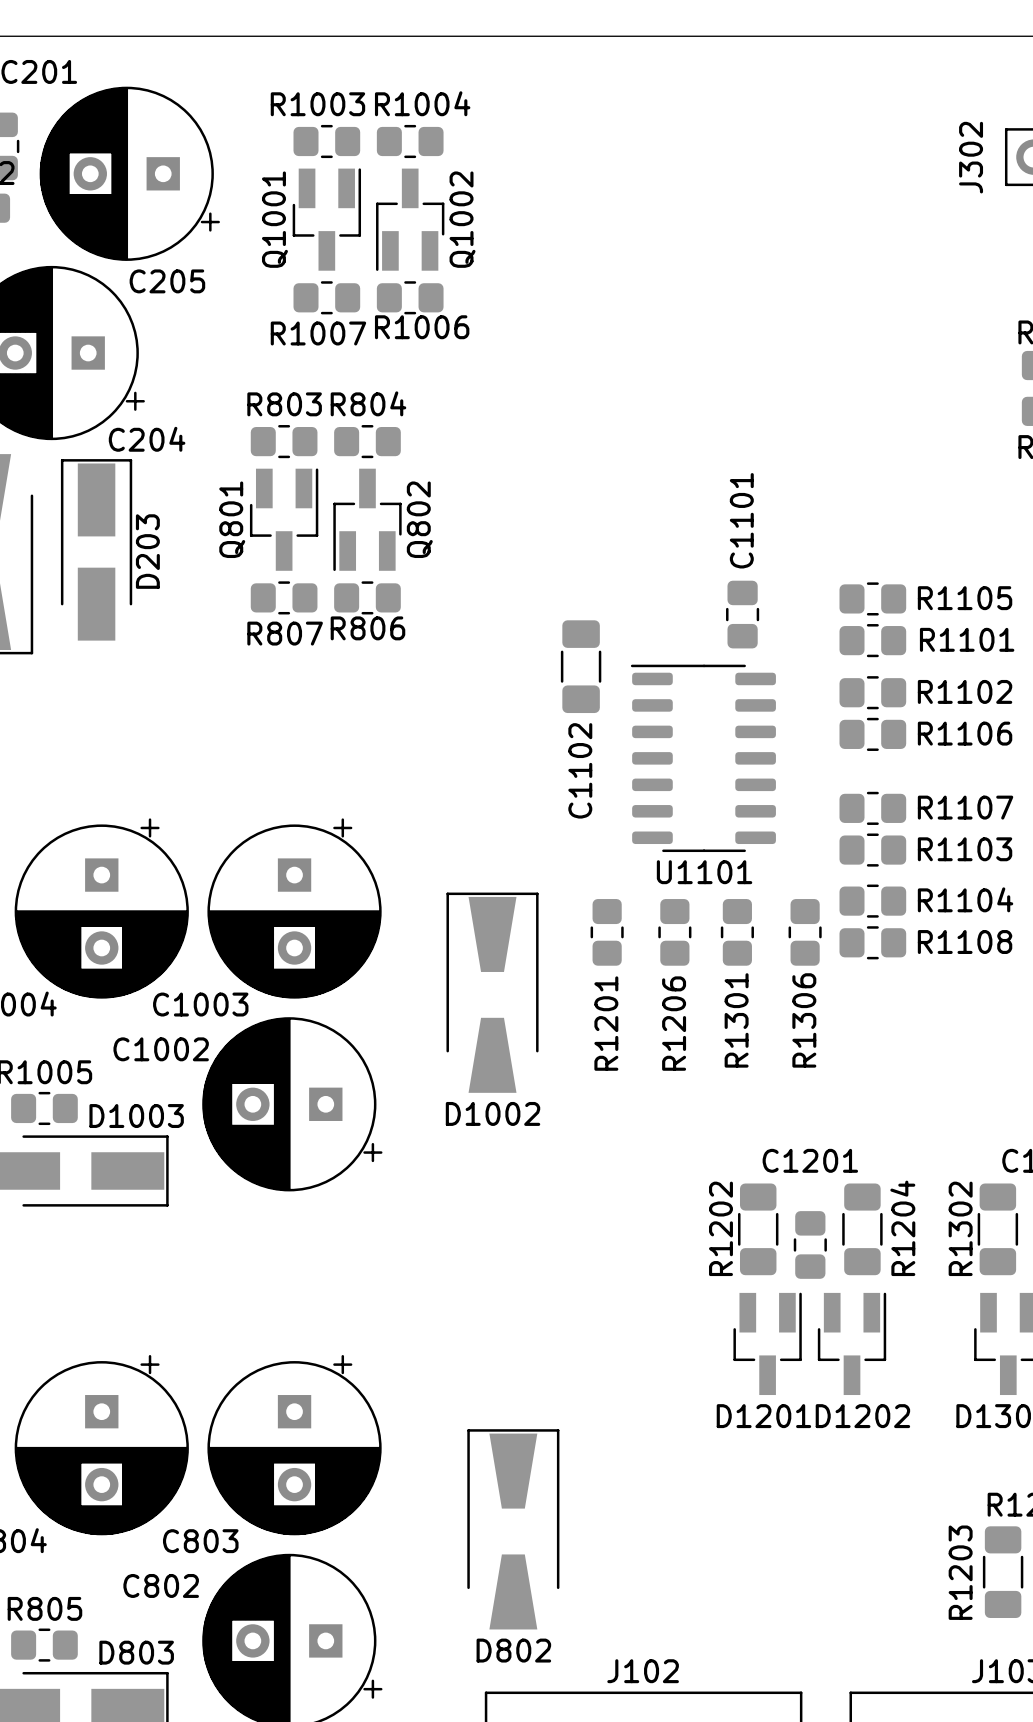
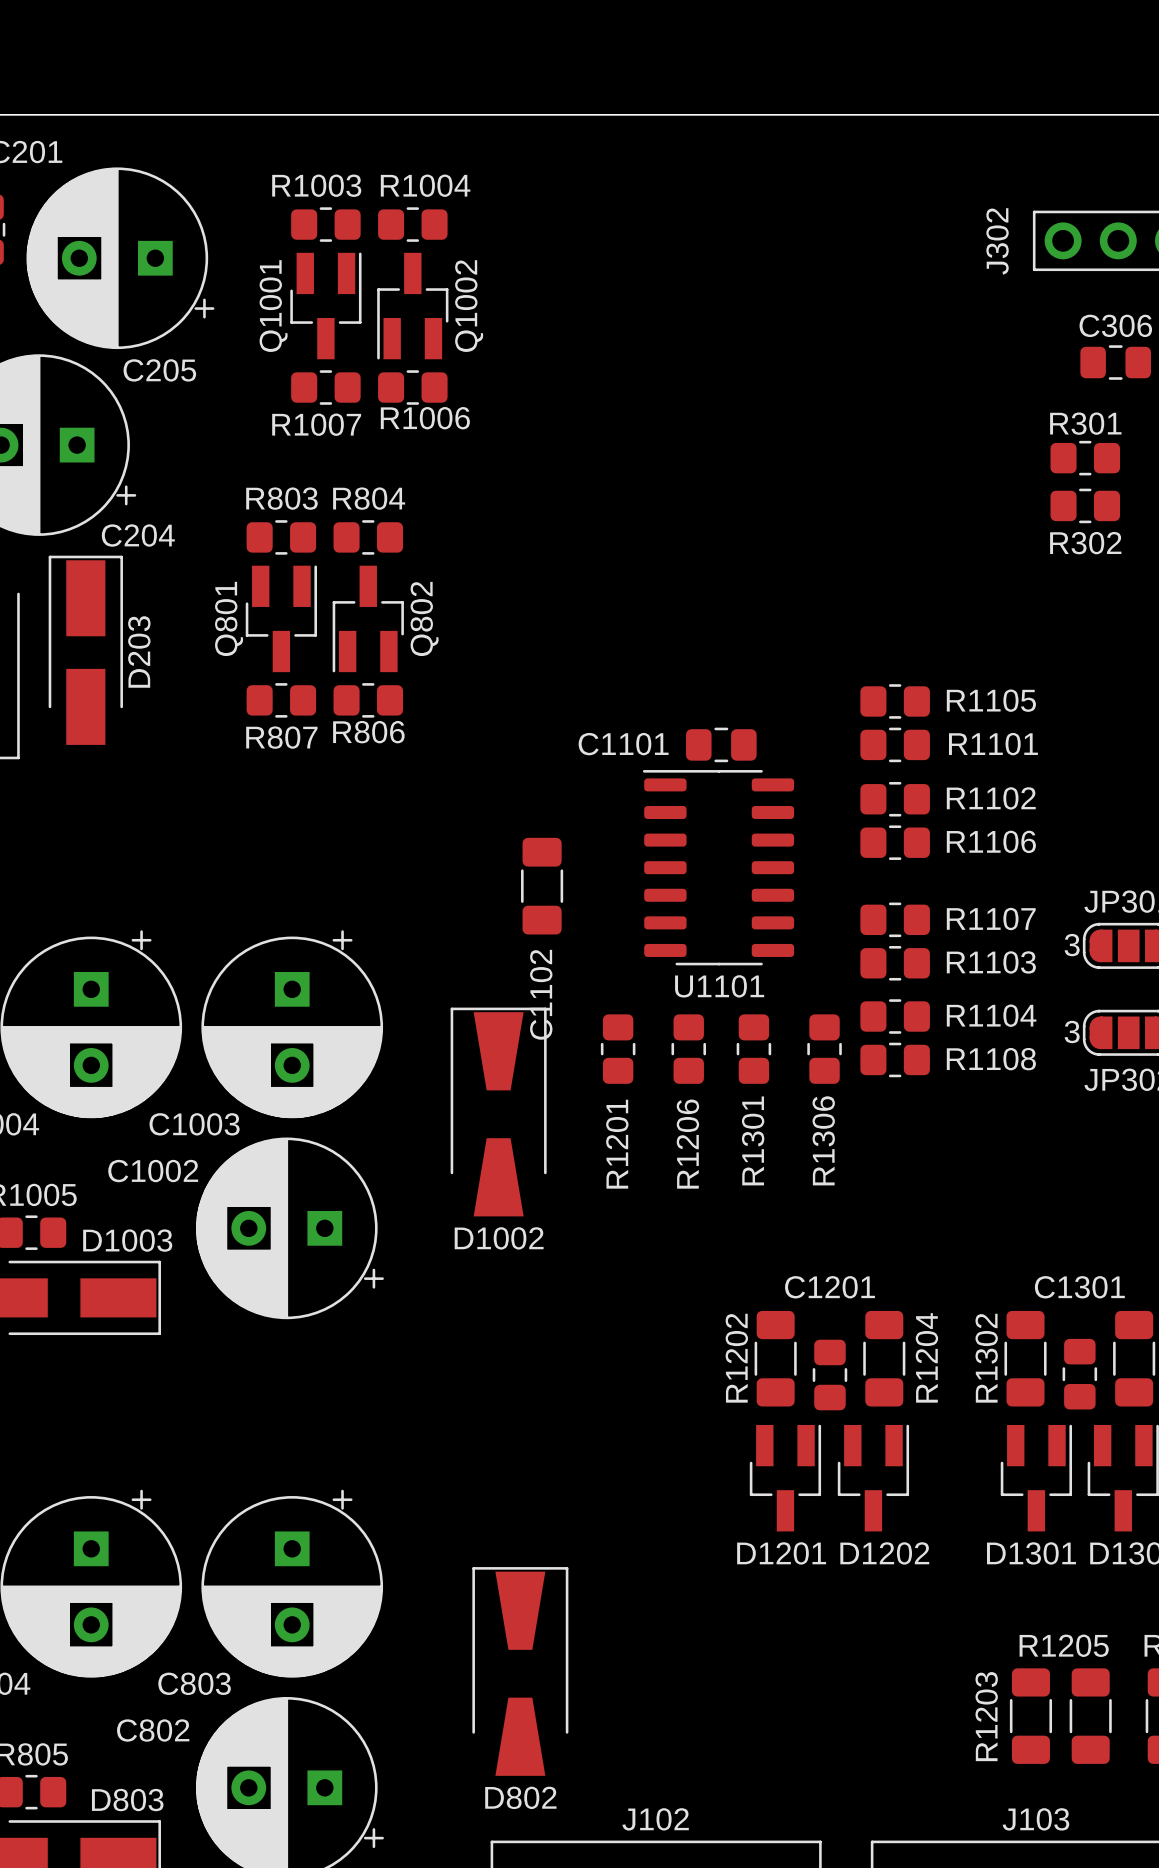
C1101 name position: C1101 (741, 520) -> C1101 (623, 744)
C1101 rotation: 0° (742, 614) -> 90° clockwise (721, 744)
C1101 position: (742, 614) -> (721, 744)
C1102 position: (581, 666) -> (542, 886)

